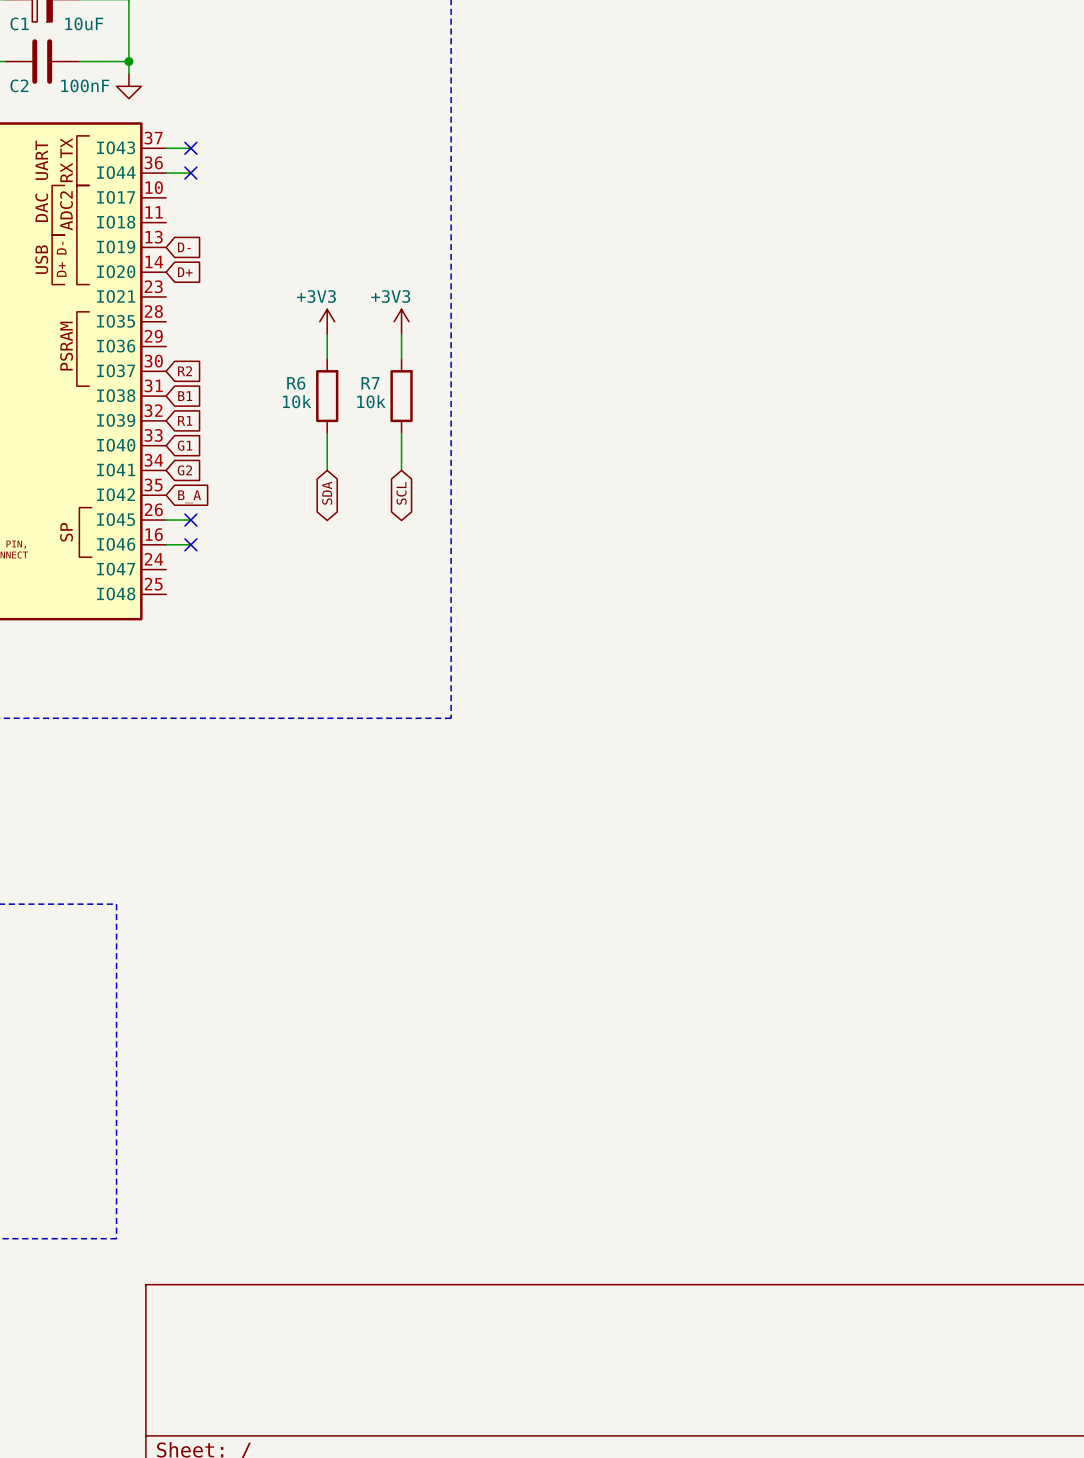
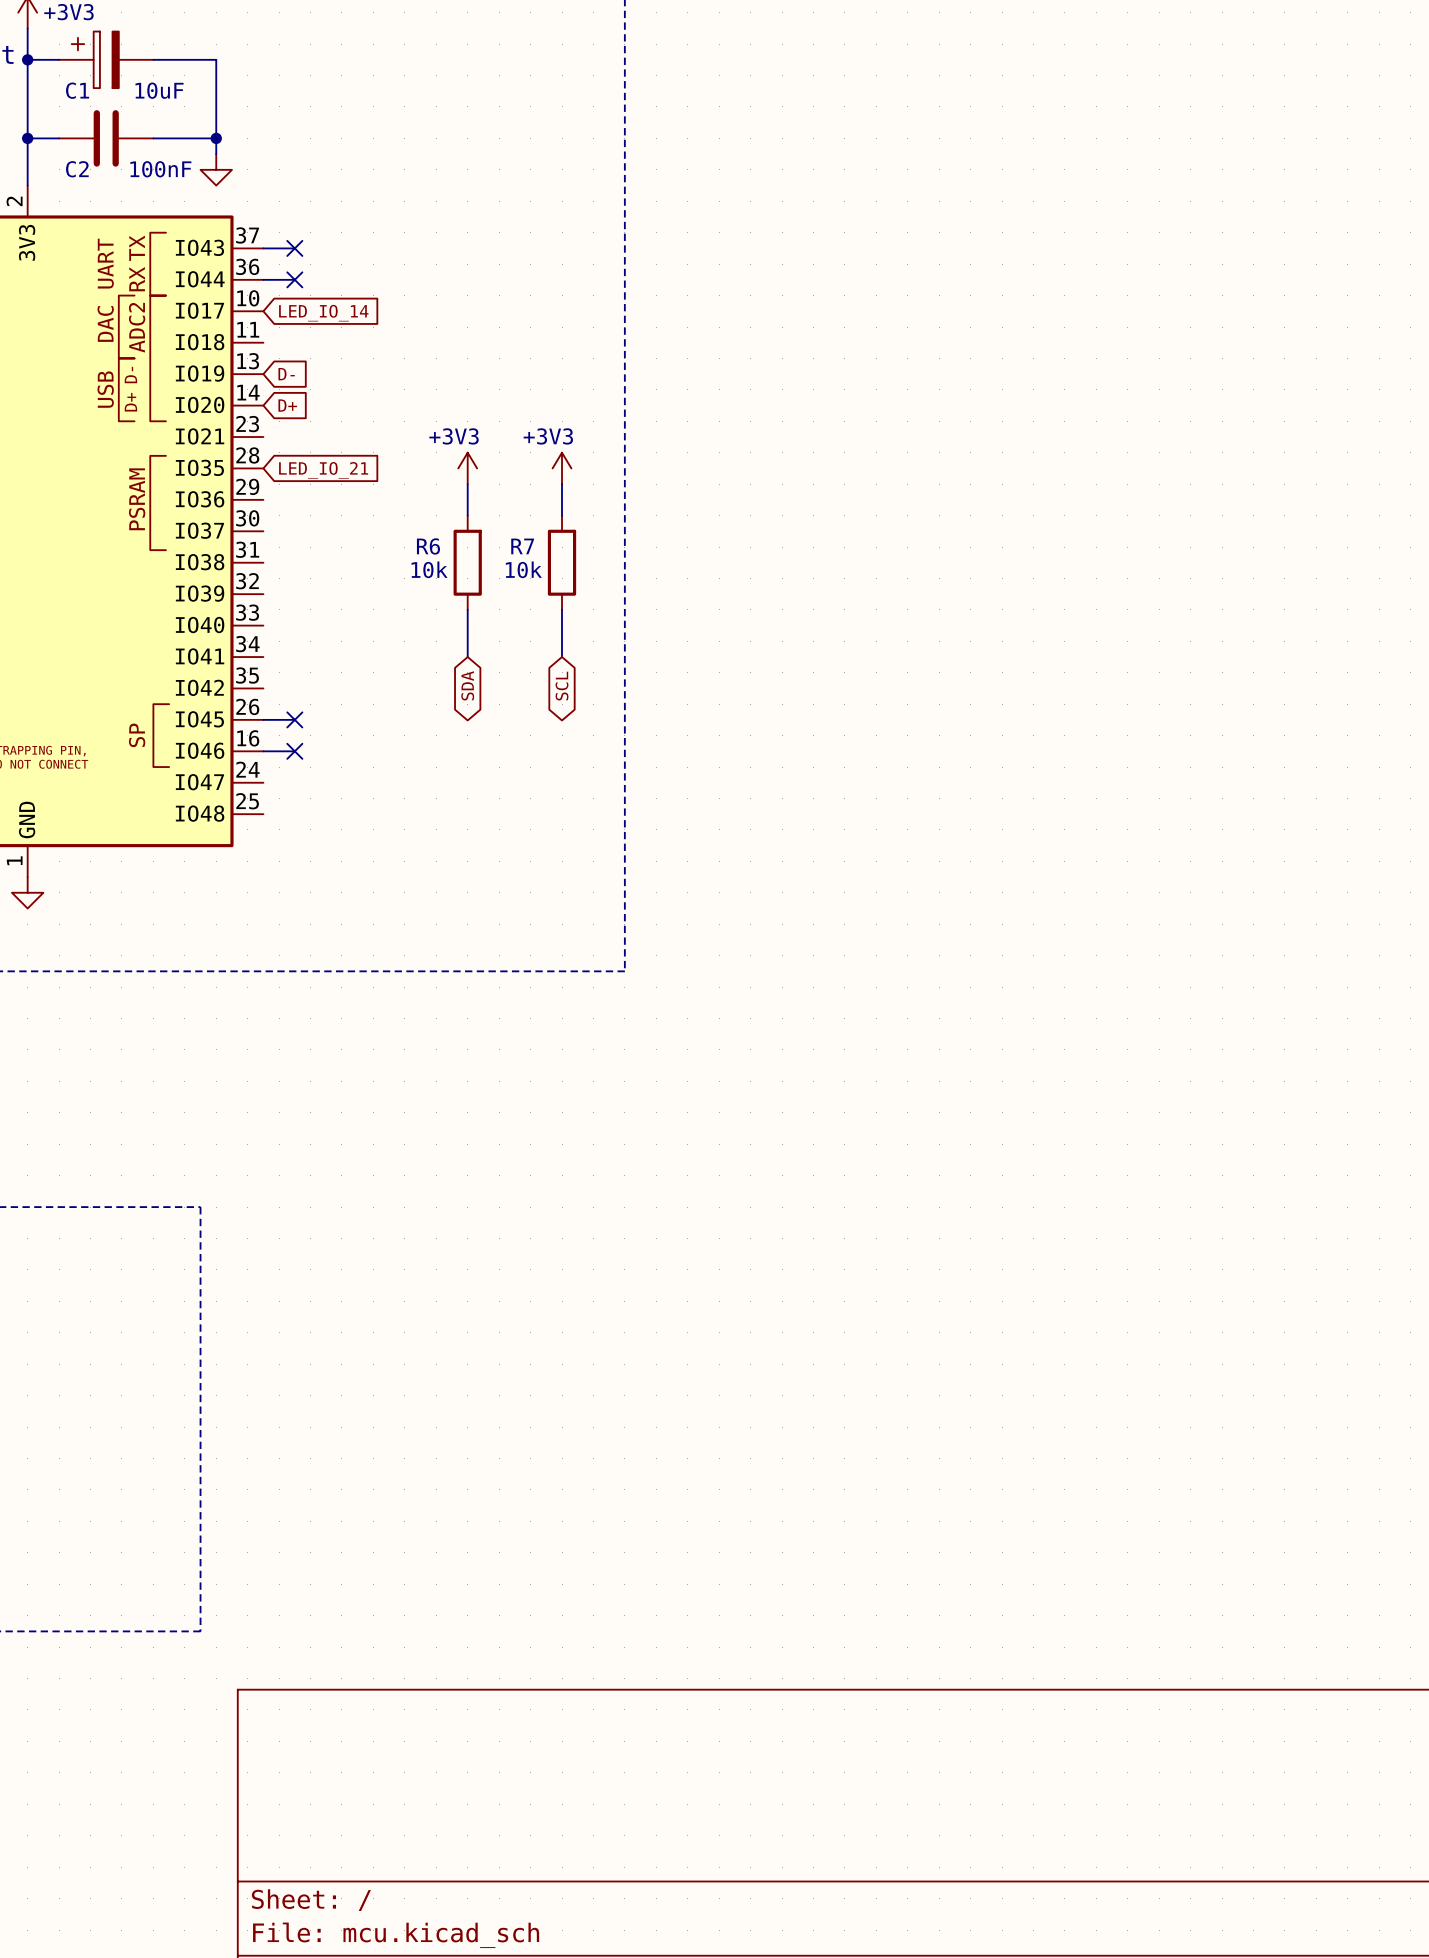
global label: none -> LED_IO_14 (323, 313)
global label: none -> LED_IO_21 (323, 470)
global label: R2 (185, 371) -> none
global label: B1 (185, 396) -> none
global label: R1 (185, 420) -> none
global label: G1 (185, 445) -> none
global label: G2 (184, 470) -> none
global label: B_A (189, 496) -> none

